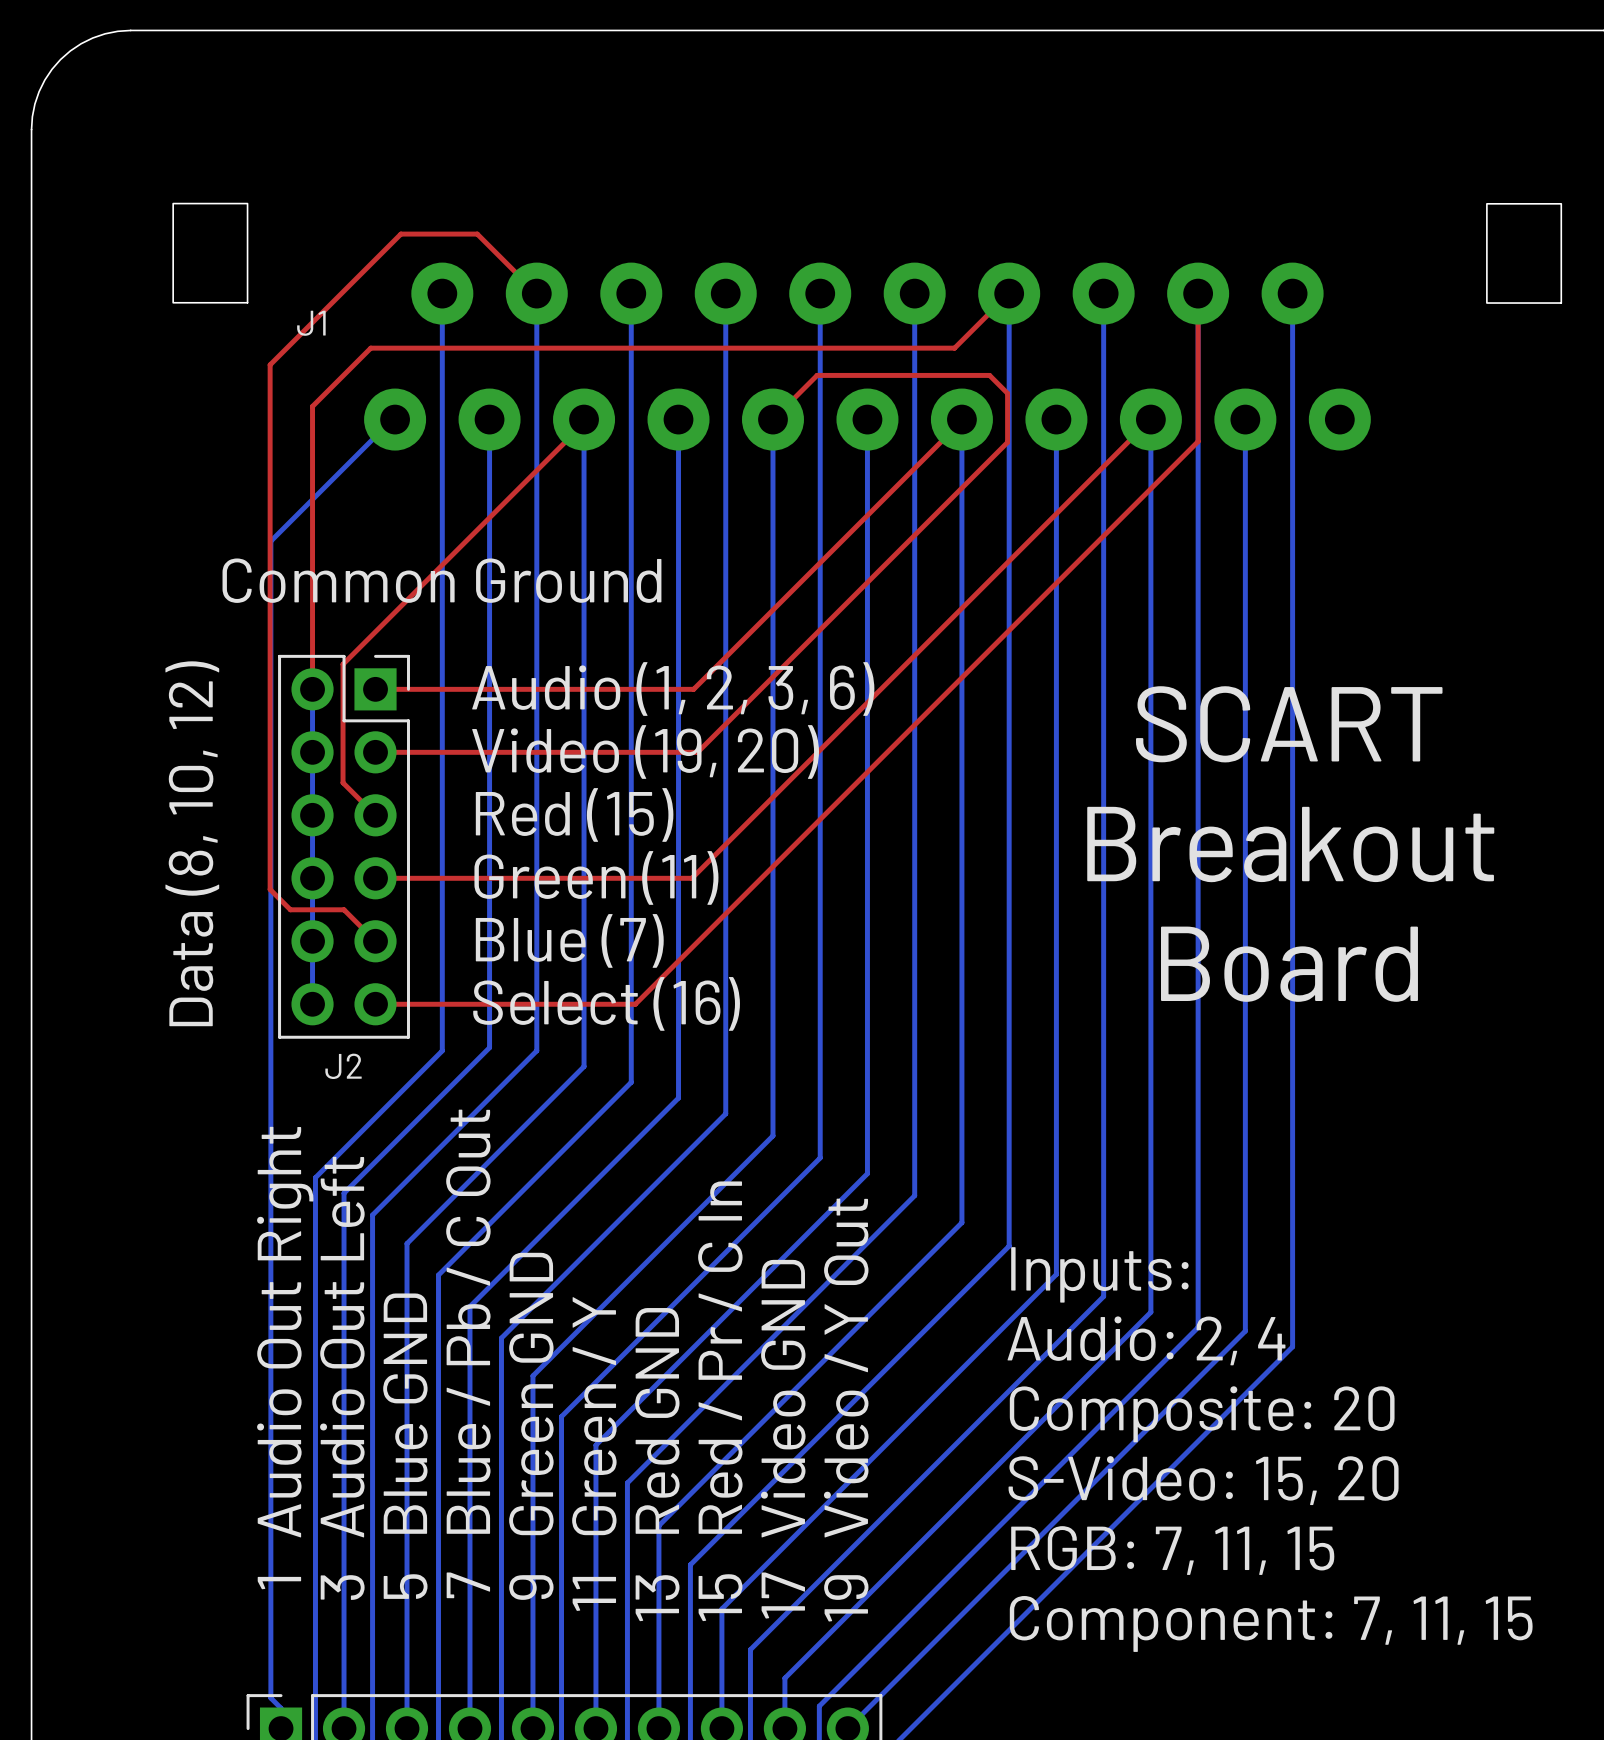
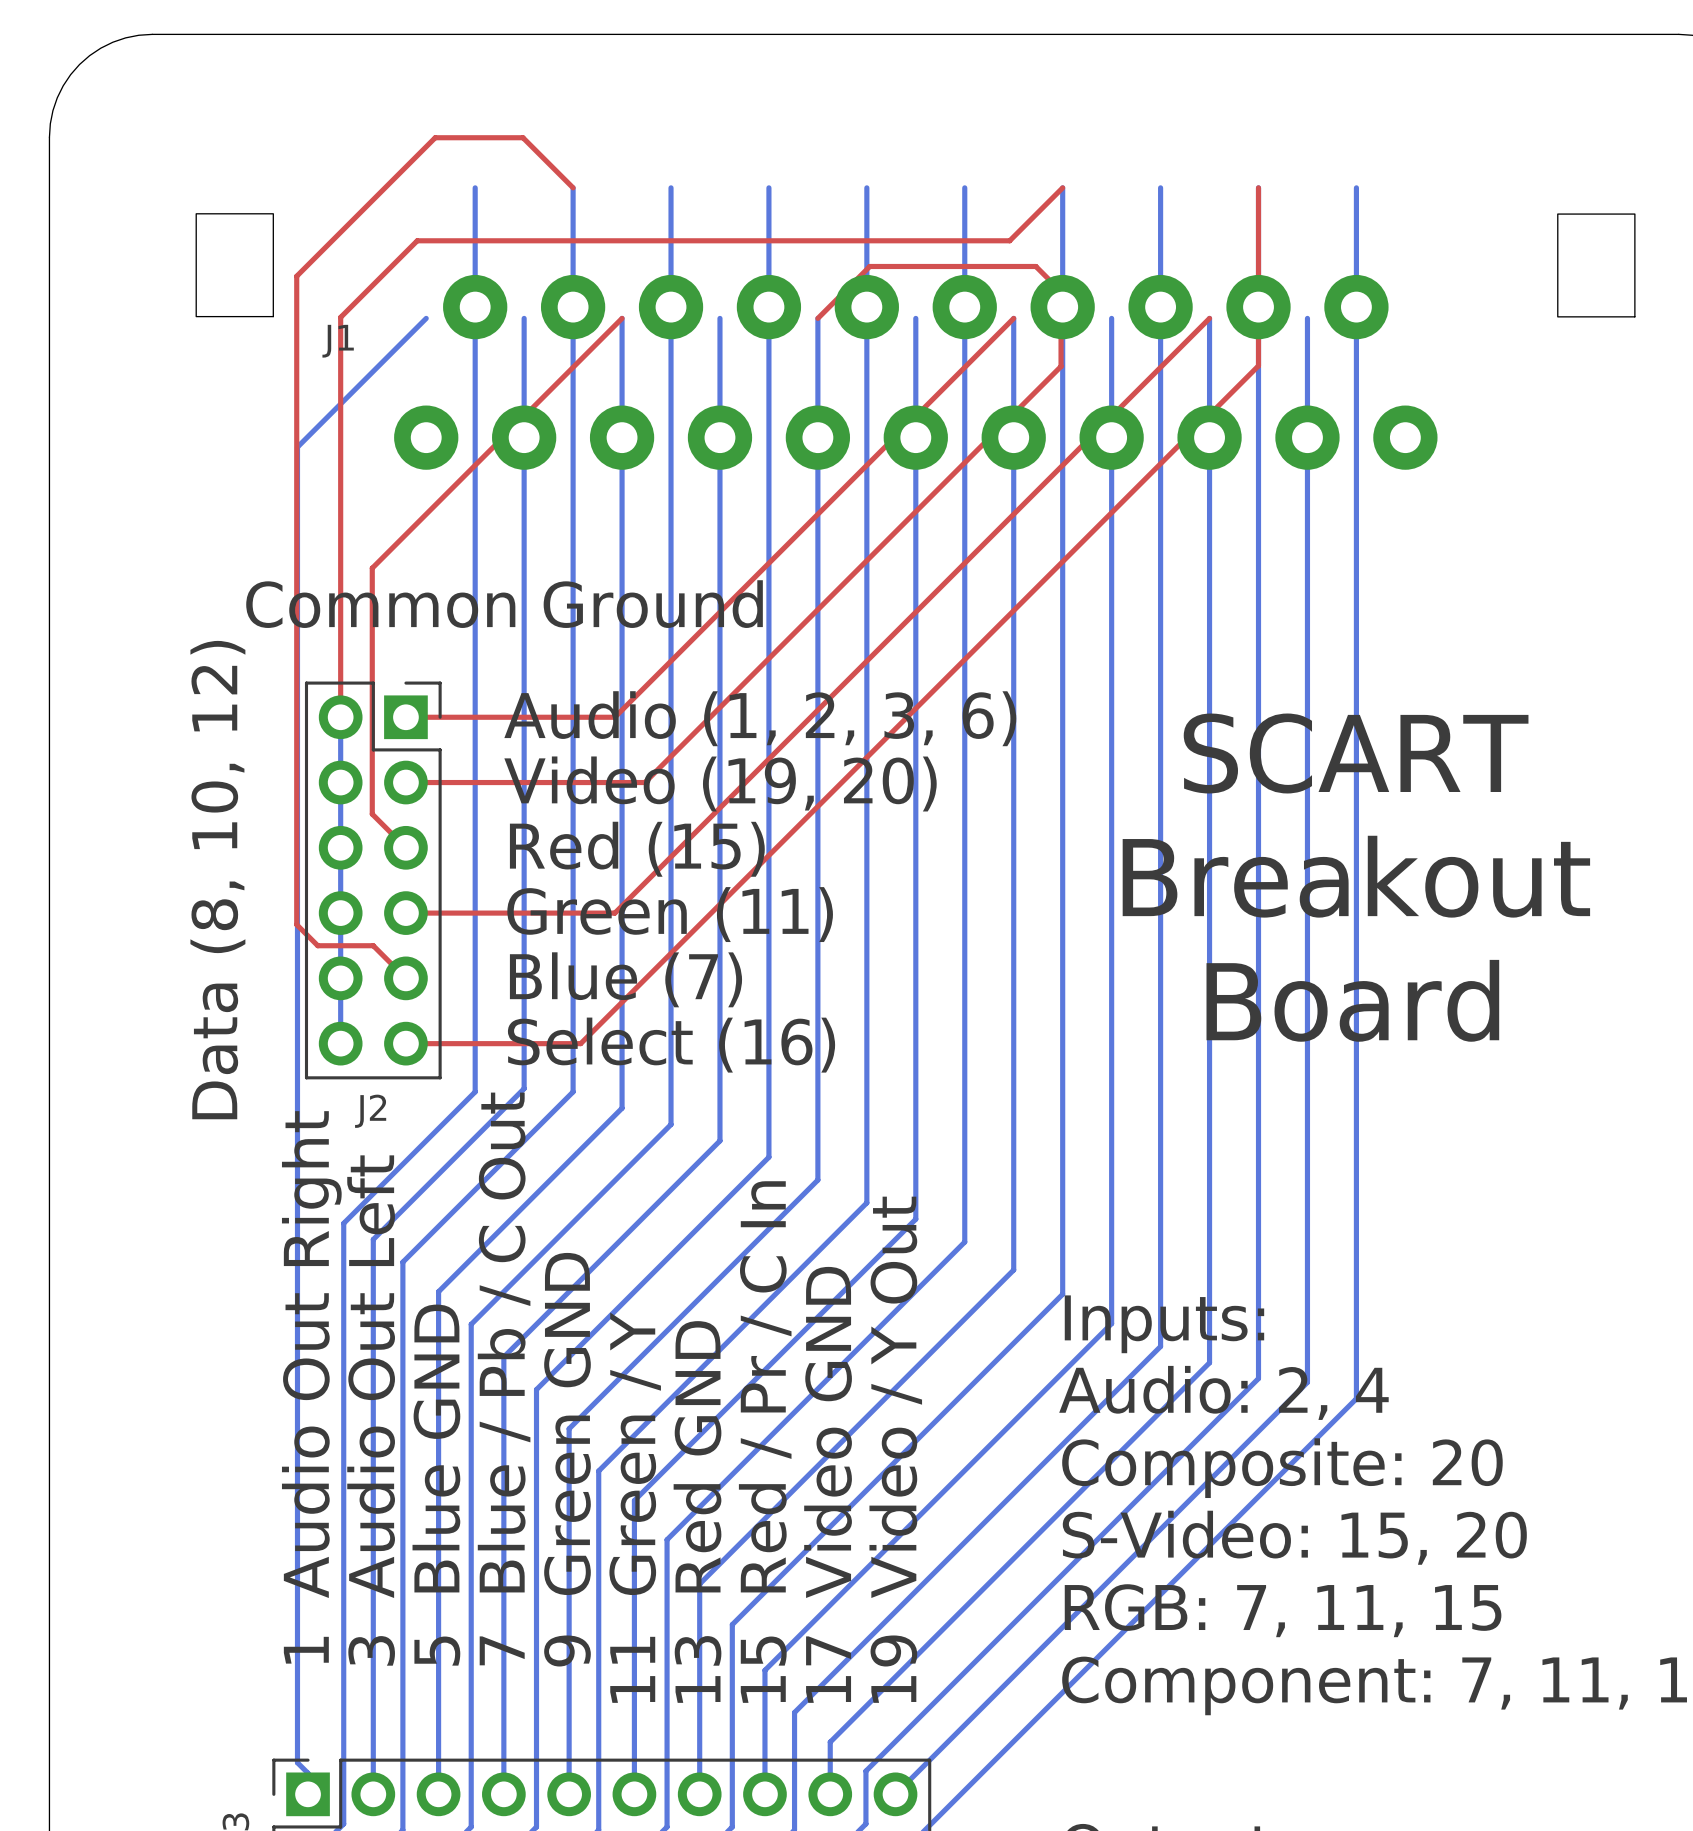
bottom track: none -> (475, 187) (475, 307)
bottom track: none -> (573, 187) (573, 307)
bottom track: none -> (671, 187) (671, 305)
bottom track: none -> (768, 187) (768, 307)
bottom track: none -> (866, 187) (866, 308)
bottom track: none -> (964, 187) (964, 305)
bottom track: none -> (1062, 187) (1062, 305)
bottom track: none -> (1160, 187) (1160, 305)
top track: none -> (1258, 187) (1258, 306)
bottom track: none -> (1356, 187) (1356, 301)
top track: (536, 293) (477, 234) (400, 234) (270, 364) -> (573, 187) (522, 137) (435, 137) (296, 276) (296, 380)
top track: (1009, 293) (954, 348) (370, 348) (312, 406) -> (1062, 187) (1009, 240) (417, 240) (340, 317) (340, 424)
bottom track: none -> (524, 318) (524, 435)
bottom track: none -> (622, 318) (622, 434)
bottom track: none -> (719, 318) (719, 438)
bottom track: none -> (817, 318) (817, 436)
bottom track: none -> (915, 318) (915, 434)
bottom track: none -> (1013, 318) (1013, 436)
bottom track: none -> (1111, 318) (1111, 436)
bottom track: none -> (1209, 318) (1209, 436)
bottom track: none -> (1307, 318) (1307, 432)
top track: (1198, 350) (1198, 441) (635, 1004) (544, 1004) -> (1258, 365) (580, 1043)
bottom track: (395, 416) (270, 541) -> (426, 318) (297, 447) (297, 563)
top track: (772, 419) (817, 375) (989, 375) (1007, 393) (1007, 442) (697, 752) (606, 752) -> (817, 318) (869, 266) (1035, 266) (1061, 291) (1061, 366) (644, 782)
top track: (1150, 419) (691, 878) (577, 878) -> (1209, 318) (614, 913)
top track: (961, 421) (693, 689) (577, 689) -> (1013, 318) (614, 717)
top track: (584, 423) (343, 664) -> (622, 318) (372, 568) (372, 691)

